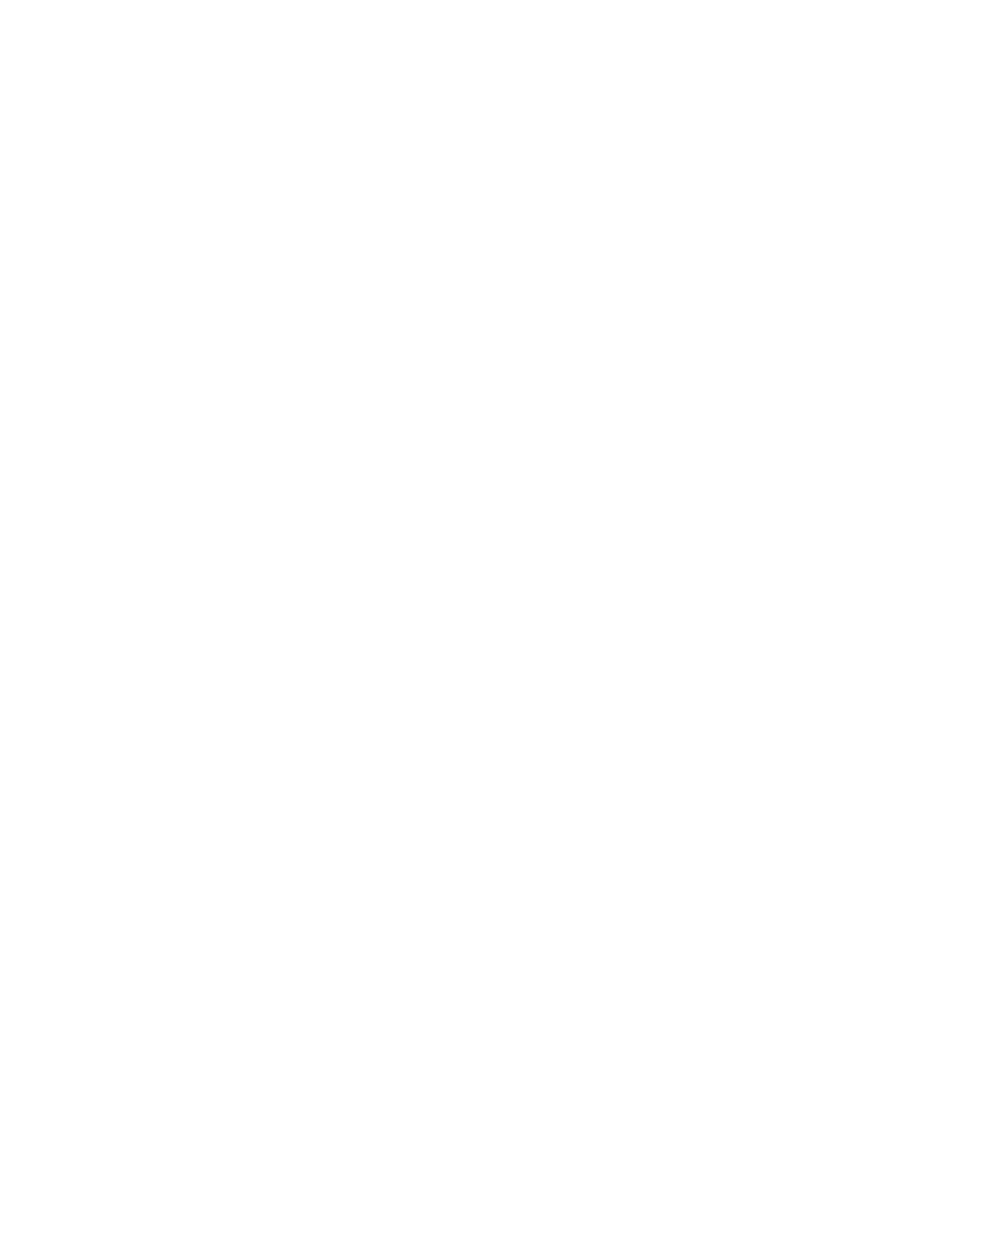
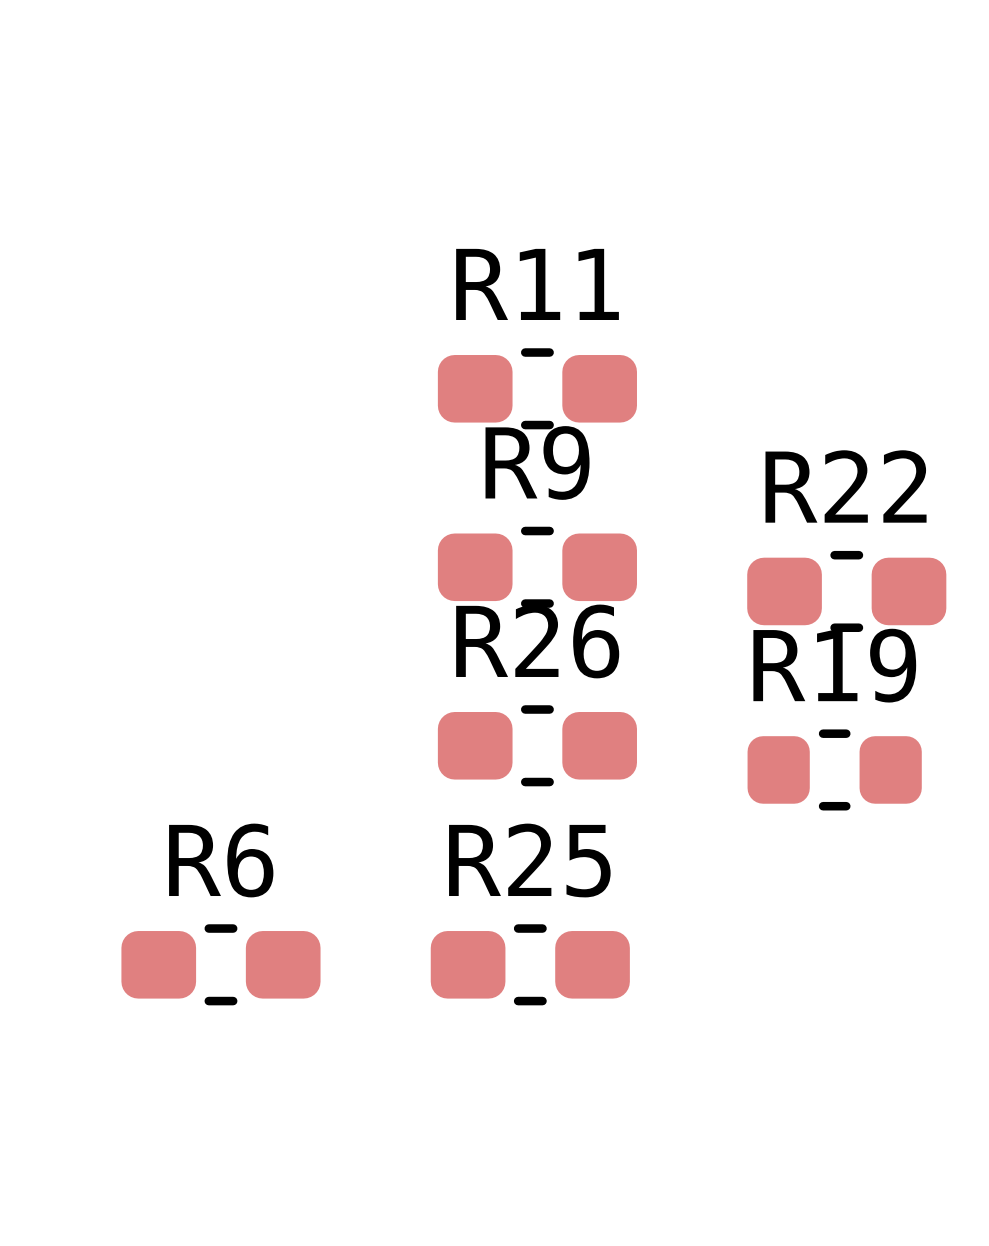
R11: none -> (537, 388)
R9: none -> (537, 567)
R22: none -> (846, 591)
R26: none -> (537, 745)
R19: none -> (834, 769)
R6: none -> (220, 964)
R25: none -> (530, 964)

